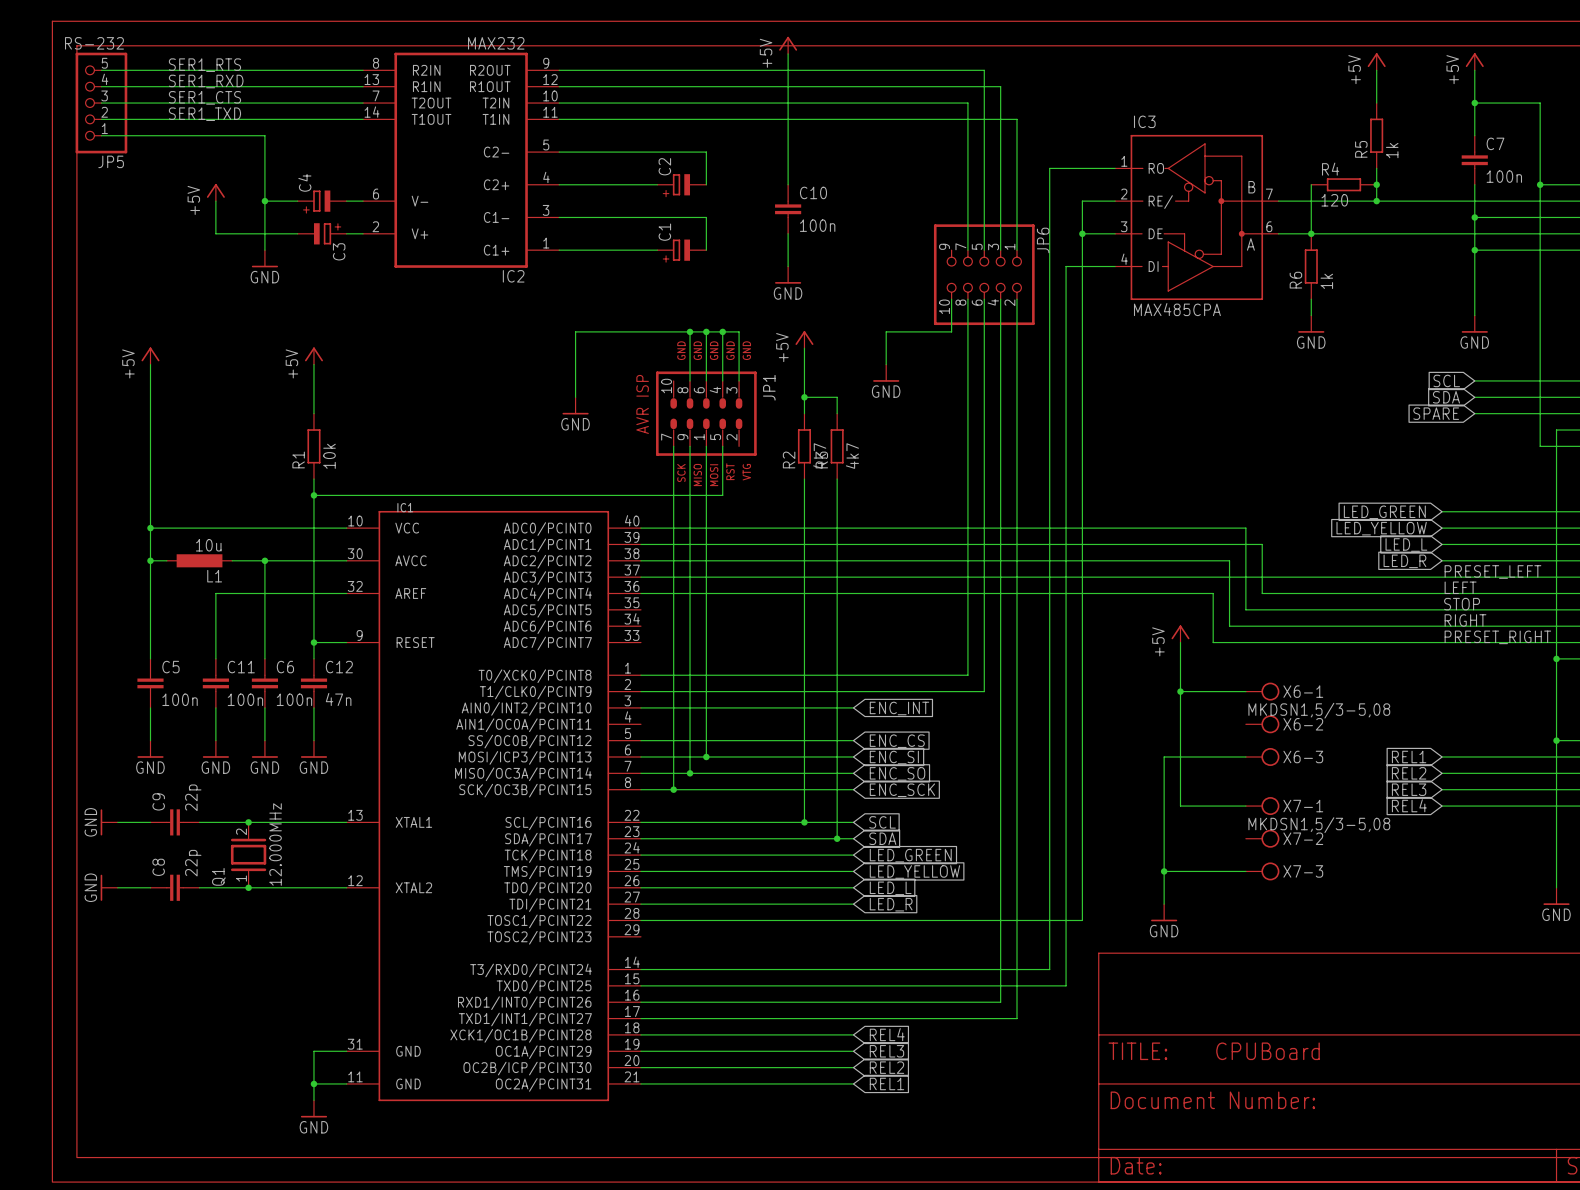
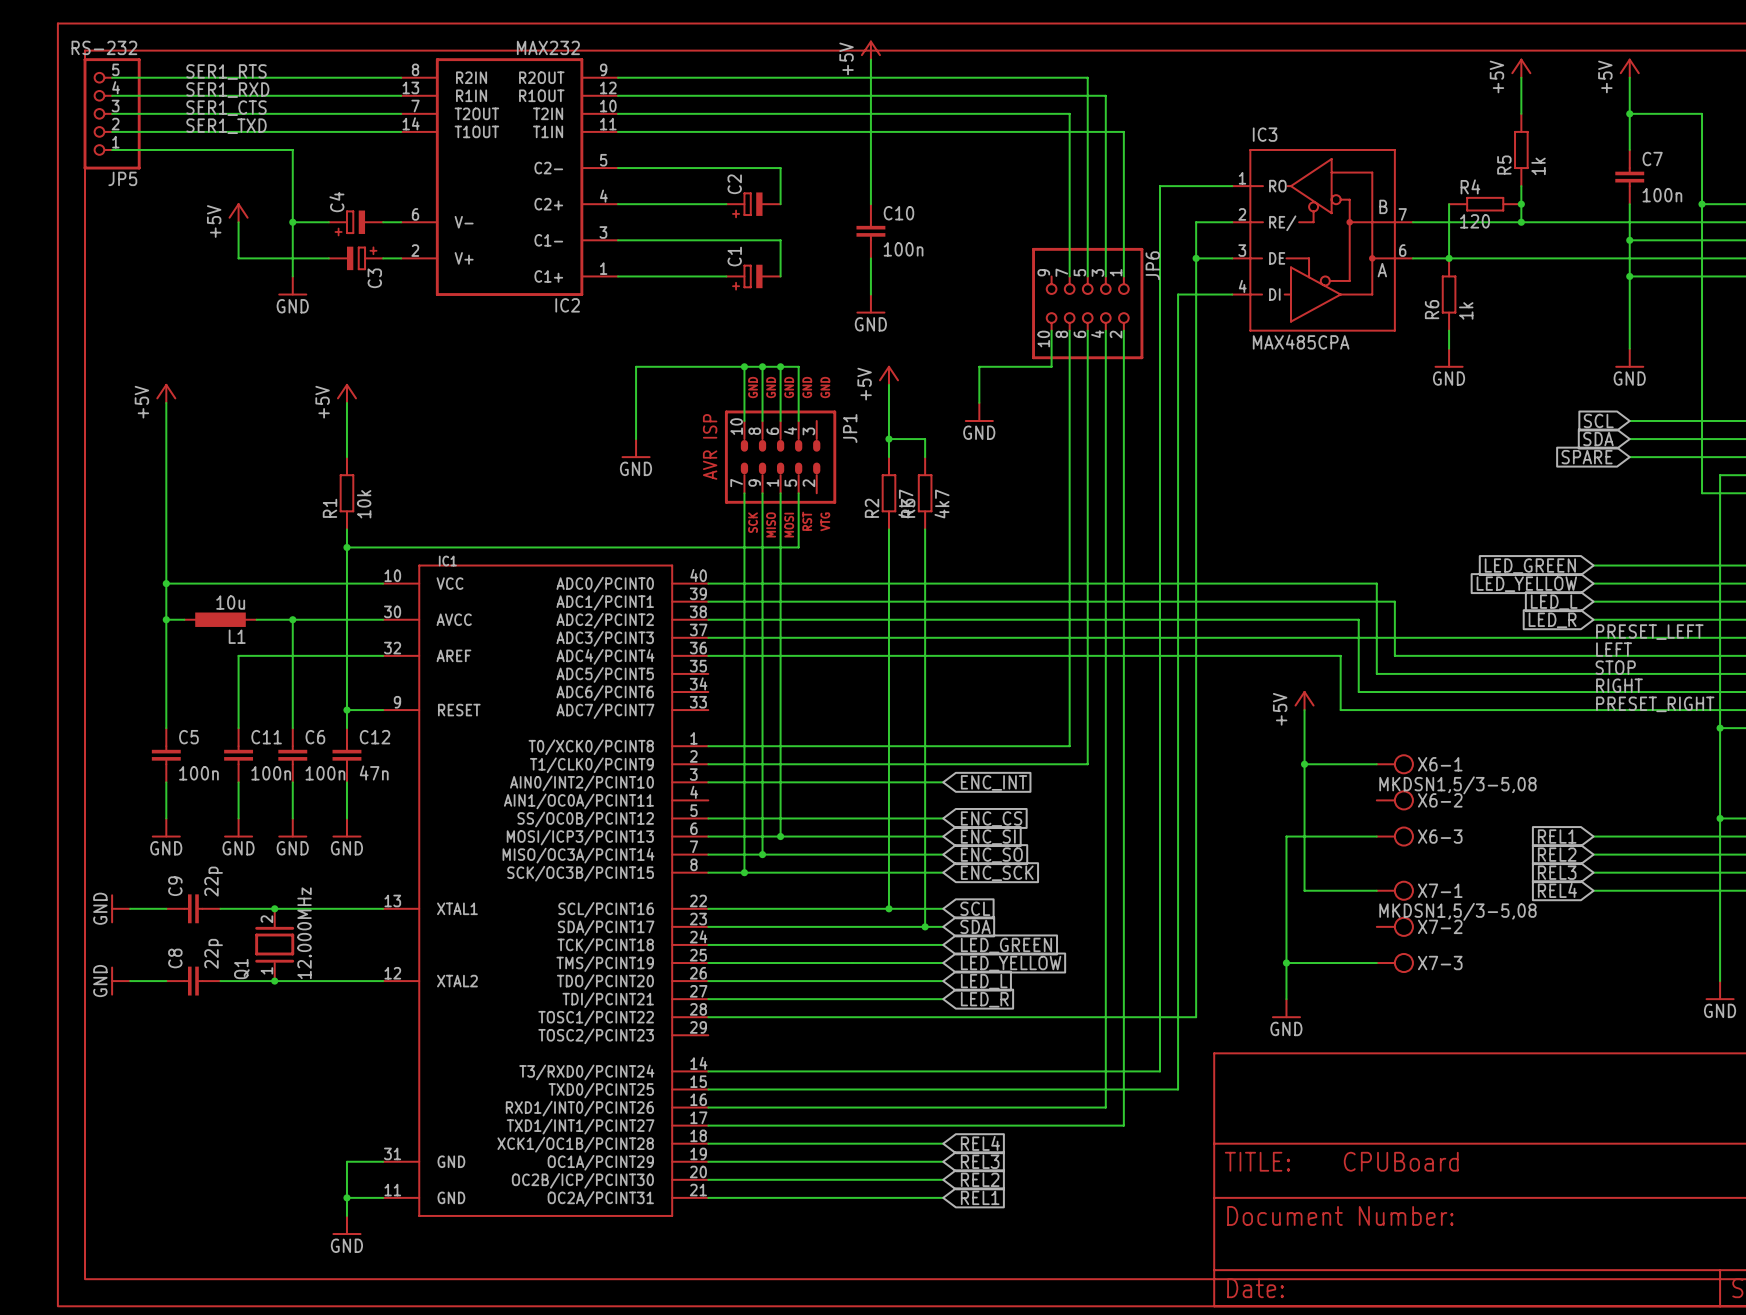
wire: none -> (744, 366) (744, 420)
junction: none -> (744, 366)
wire: (722, 331) (739, 331) (739, 380) -> none
junction: (722, 331) -> none

